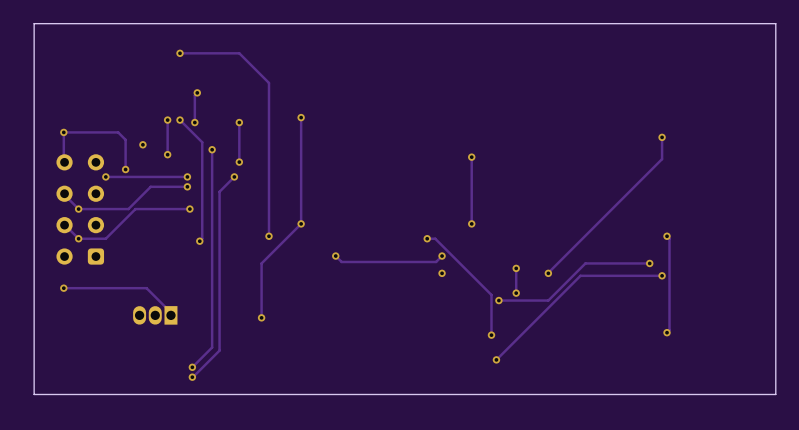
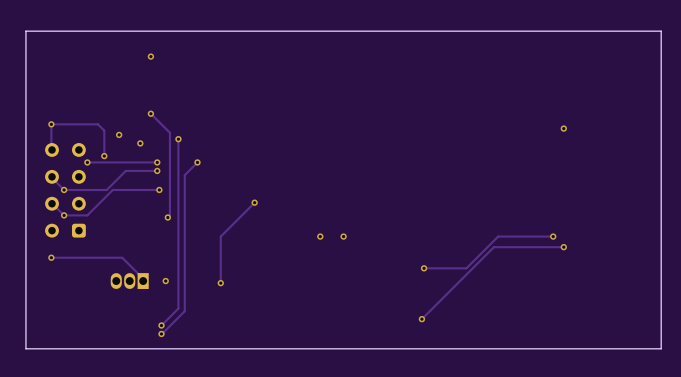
track: (180, 53) (239, 53) (268, 82) (268, 236) -> none
track: (197, 92) (194, 95) (194, 122) -> none
via: (197, 92) -> none
track: (301, 117) (301, 223) -> none
via: (301, 117) -> none
track: (167, 120) (167, 154) -> none
via: (167, 120) -> none
via: (194, 122) -> none
track: (239, 122) (239, 162) -> none
via: (239, 122) -> none
track: (662, 137) (662, 159) (547, 273) -> none
track: (471, 157) (471, 223) -> none
via: (471, 157) -> none
via: (239, 162) -> none
via: (471, 223) -> none
via: (268, 236) -> none
track: (667, 236) (669, 238) (669, 330) (667, 332) -> none
via: (667, 236) -> none
track: (427, 238) (435, 238) (491, 294) (491, 335) -> none
via: (427, 238) -> none
via: (335, 256) -> none
track: (442, 256) (436, 261) (341, 261) (335, 256) -> none
via: (442, 256) -> none
via: none -> (320, 236)
via: none -> (343, 236)
track: (516, 268) (516, 293) -> none
via: (516, 268) -> none
via: (442, 273) -> none
via: (548, 273) -> none
via: (516, 293) -> none
via: none -> (165, 281)
via: (667, 332) -> none
via: (491, 335) -> none

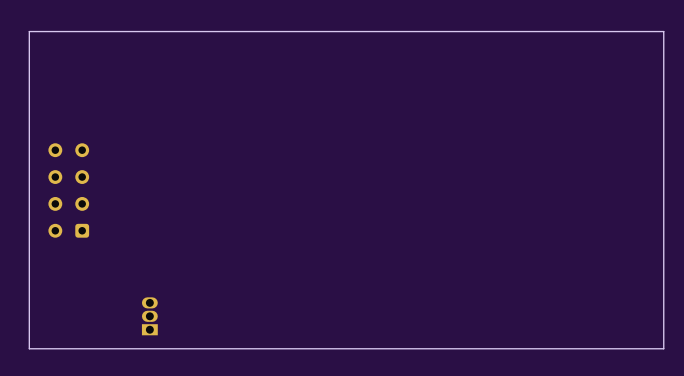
via: (150, 56) -> none
track: (150, 113) (169, 132) (169, 215) (167, 217) -> none
via: (150, 113) -> none
via: (51, 124) -> none
via: (563, 128) -> none
via: (119, 134) -> none
track: (178, 139) (178, 308) (161, 325) -> none
via: (178, 139) -> none
via: (140, 143) -> none
track: (52, 149) (51, 124) (97, 124) (104, 130) (104, 156) -> none
via: (104, 156) -> none
via: (87, 162) -> none
track: (157, 162) (87, 162) -> none
via: (157, 162) -> none
track: (197, 162) (184, 175) (184, 311) (161, 333) -> none
via: (197, 162) -> none
track: (157, 170) (125, 170) (106, 189) (64, 189) (52, 176) -> none
via: (157, 170) -> none
via: (64, 189) -> none
track: (159, 189) (112, 189) (87, 215) (64, 215) (52, 203) -> none
via: (159, 189) -> none
track: (254, 202) (220, 236) (220, 283) -> none
via: (254, 202) -> none
via: (64, 215) -> none
via: (167, 217) -> none
via: (320, 236) -> none
via: (343, 236) -> none
track: (553, 236) (498, 236) (466, 268) (424, 268) -> none
via: (553, 236) -> none
track: (563, 247) (493, 247) (421, 319) -> none
via: (563, 247) -> none
track: (51, 257) (122, 257) (143, 278) (143, 281) -> none
via: (51, 257) -> none
via: (424, 268) -> none
part rotation: 0° (129, 281) -> 90° clockwise (149, 316)
part position: (129, 281) -> (149, 316)
via: (165, 281) -> none
via: (220, 283) -> none
via: (421, 319) -> none
via: (161, 325) -> none
via: (161, 333) -> none

